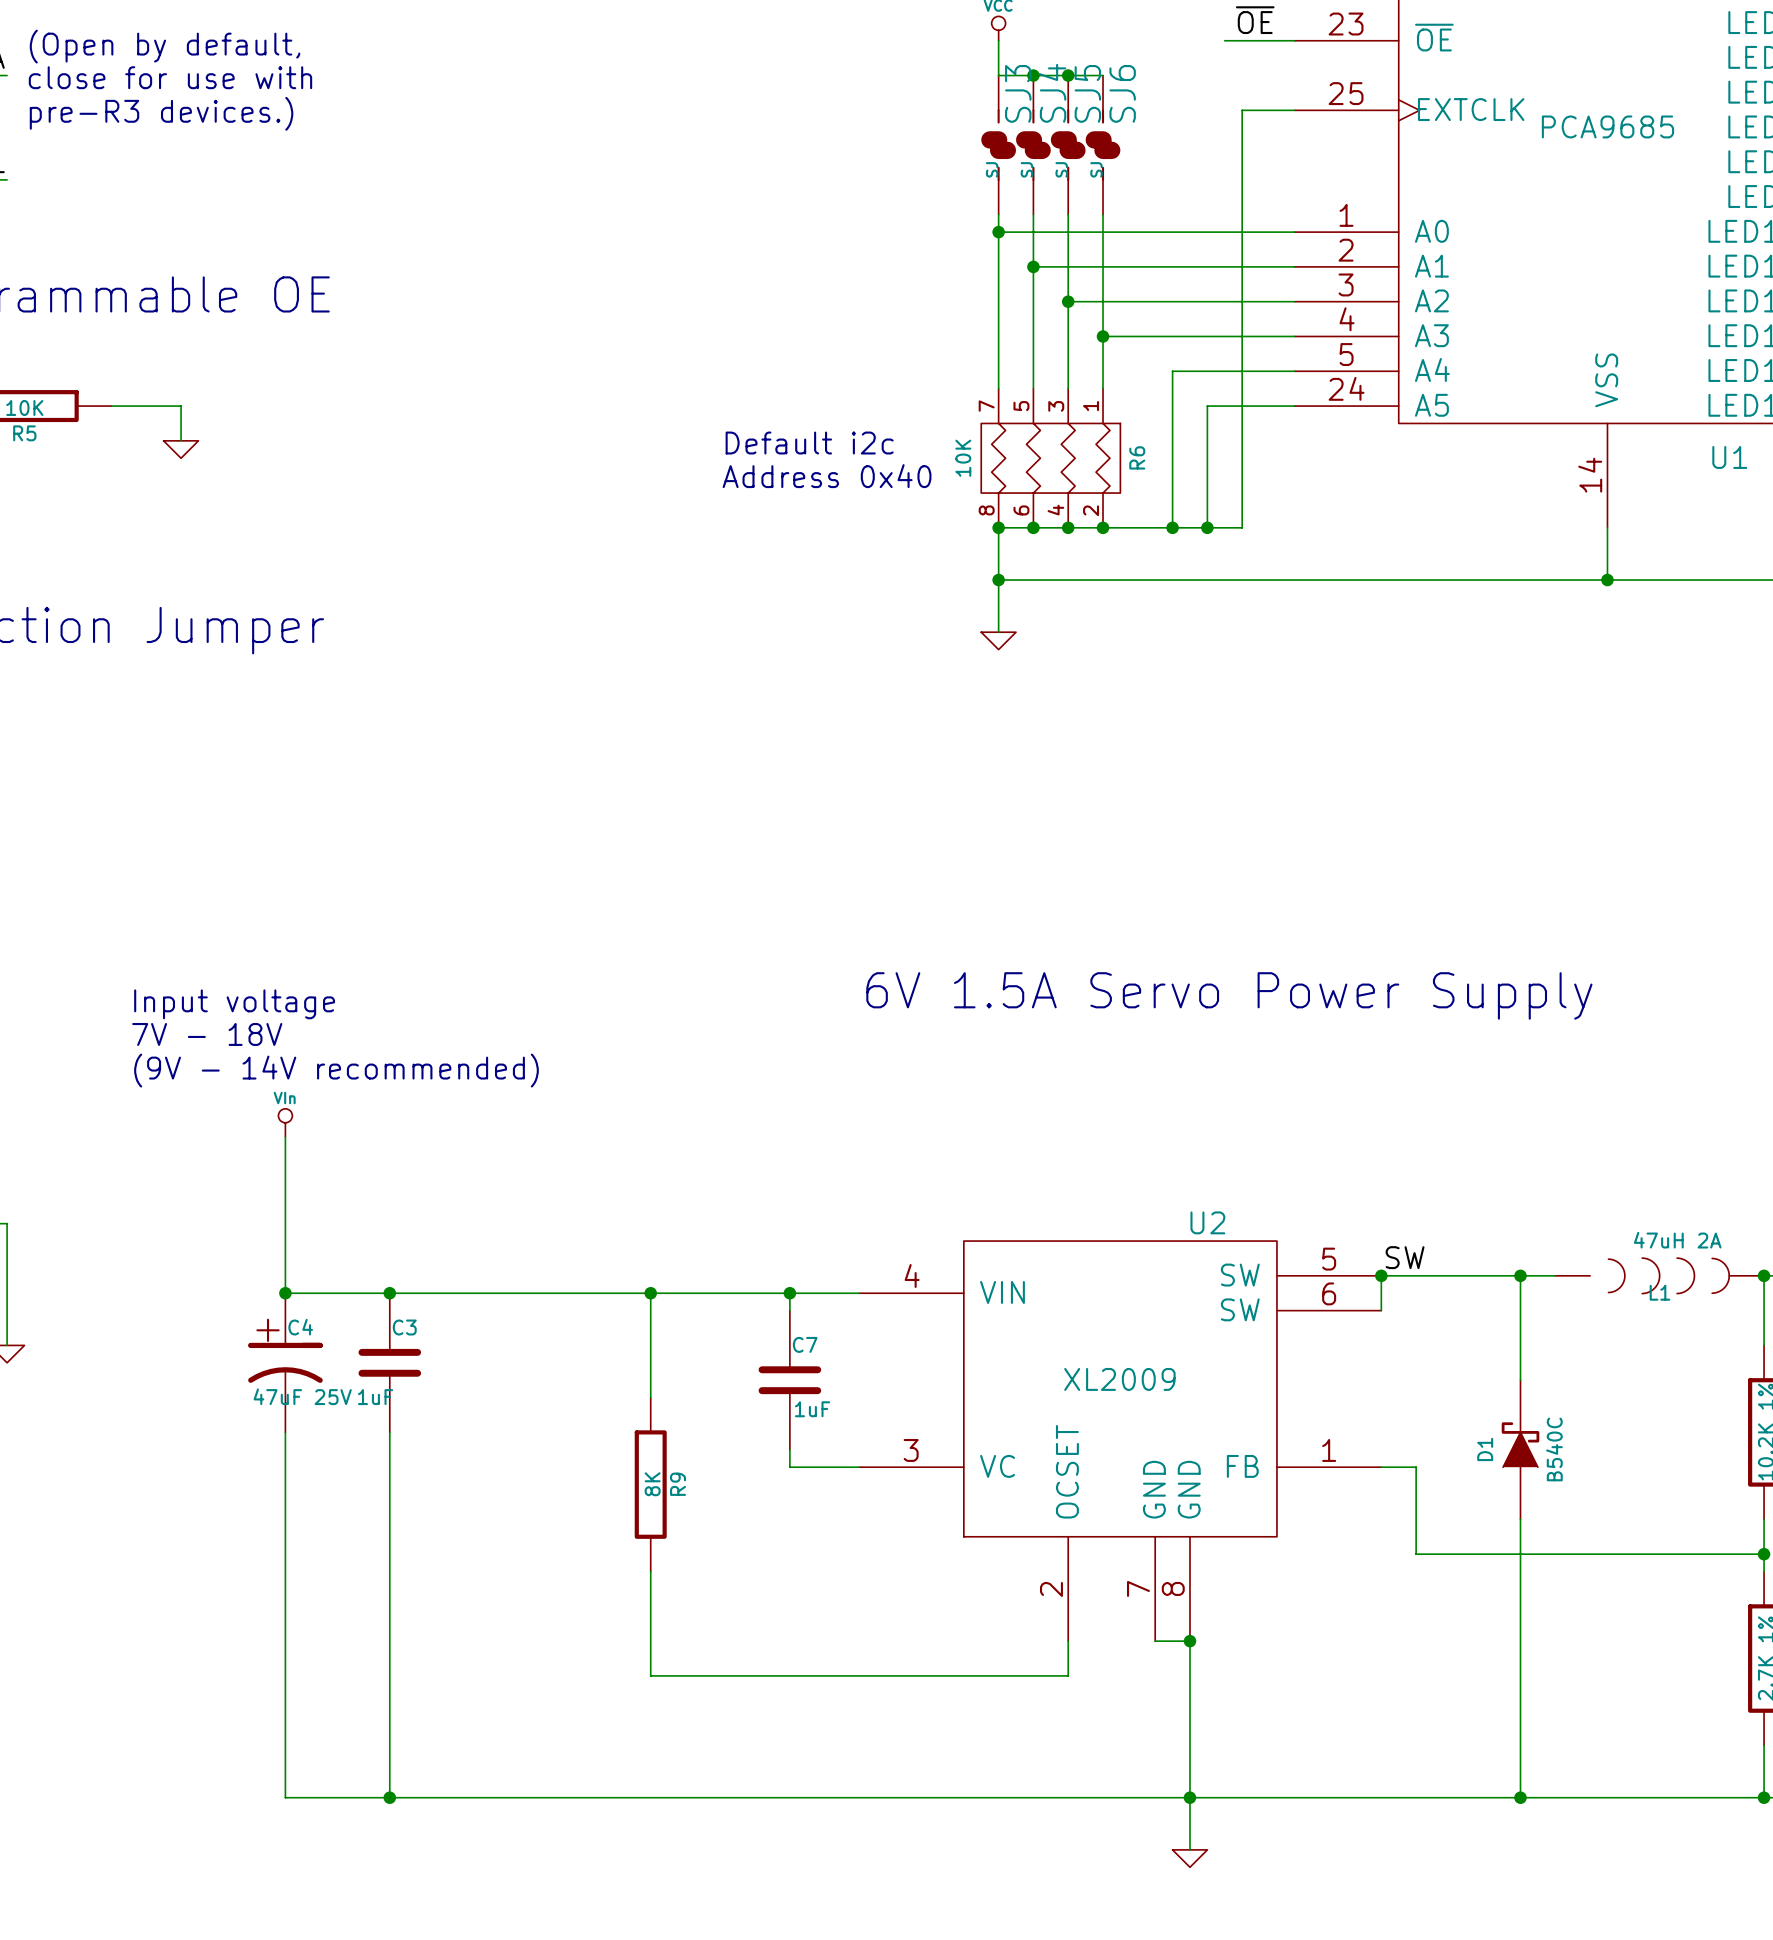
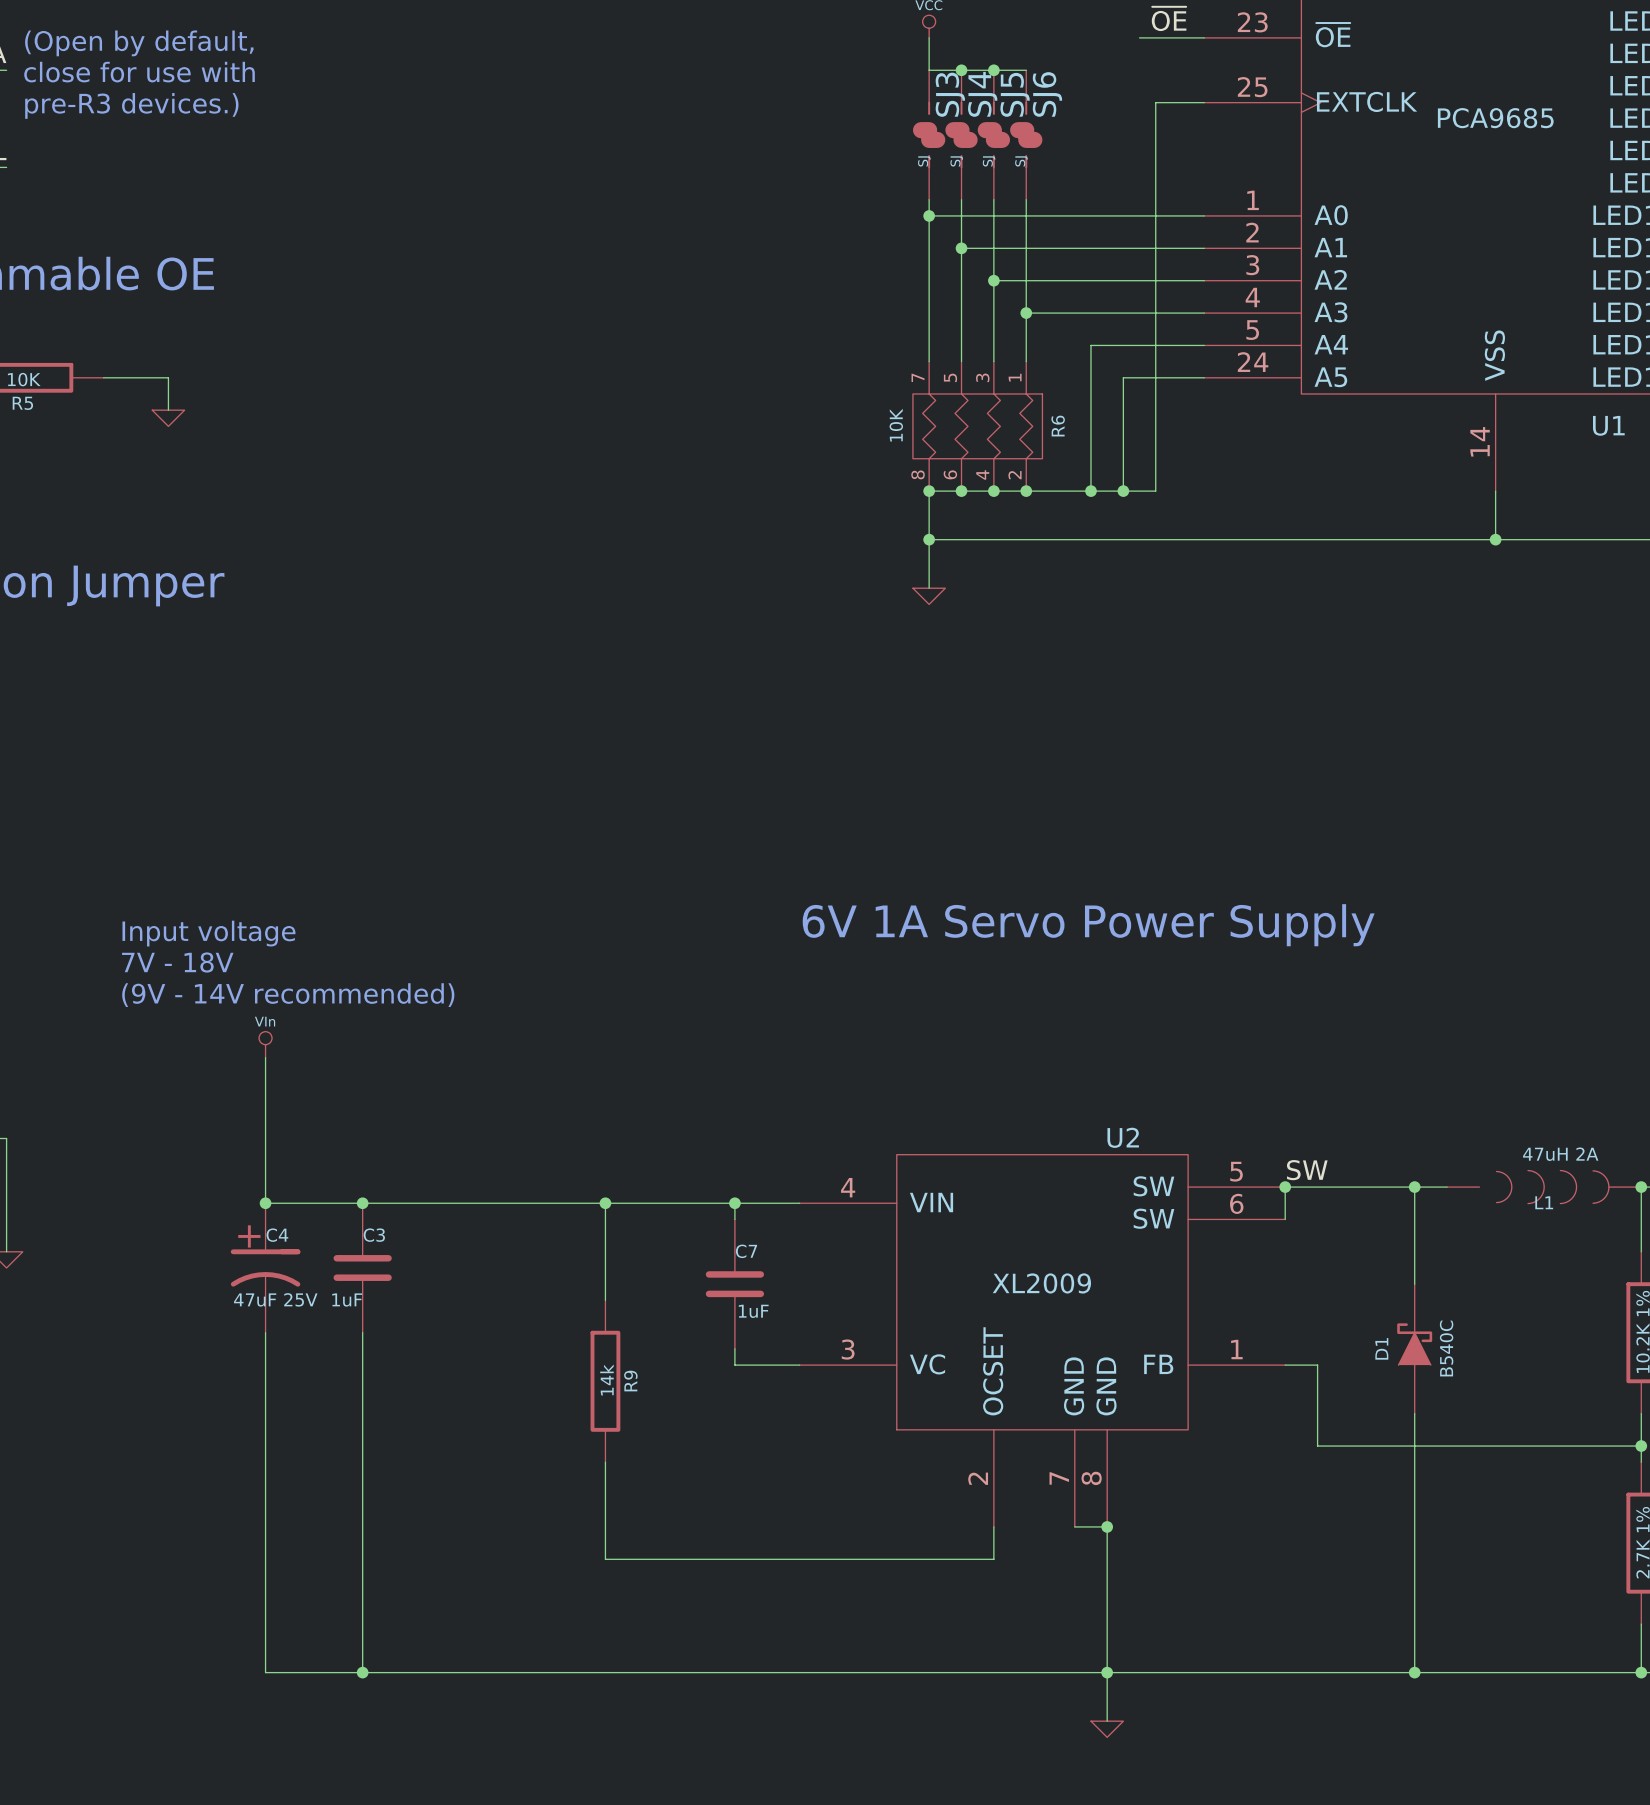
text: Default i2c (809, 443) -> none
text: Address 0x40 (827, 476) -> none
text: 6V 1.5A Servo Power Supply (1229, 995) -> 6V 1A Servo Power Supply (1088, 925)
R9 value: 8K (652, 1484) -> 14k (606, 1380)

